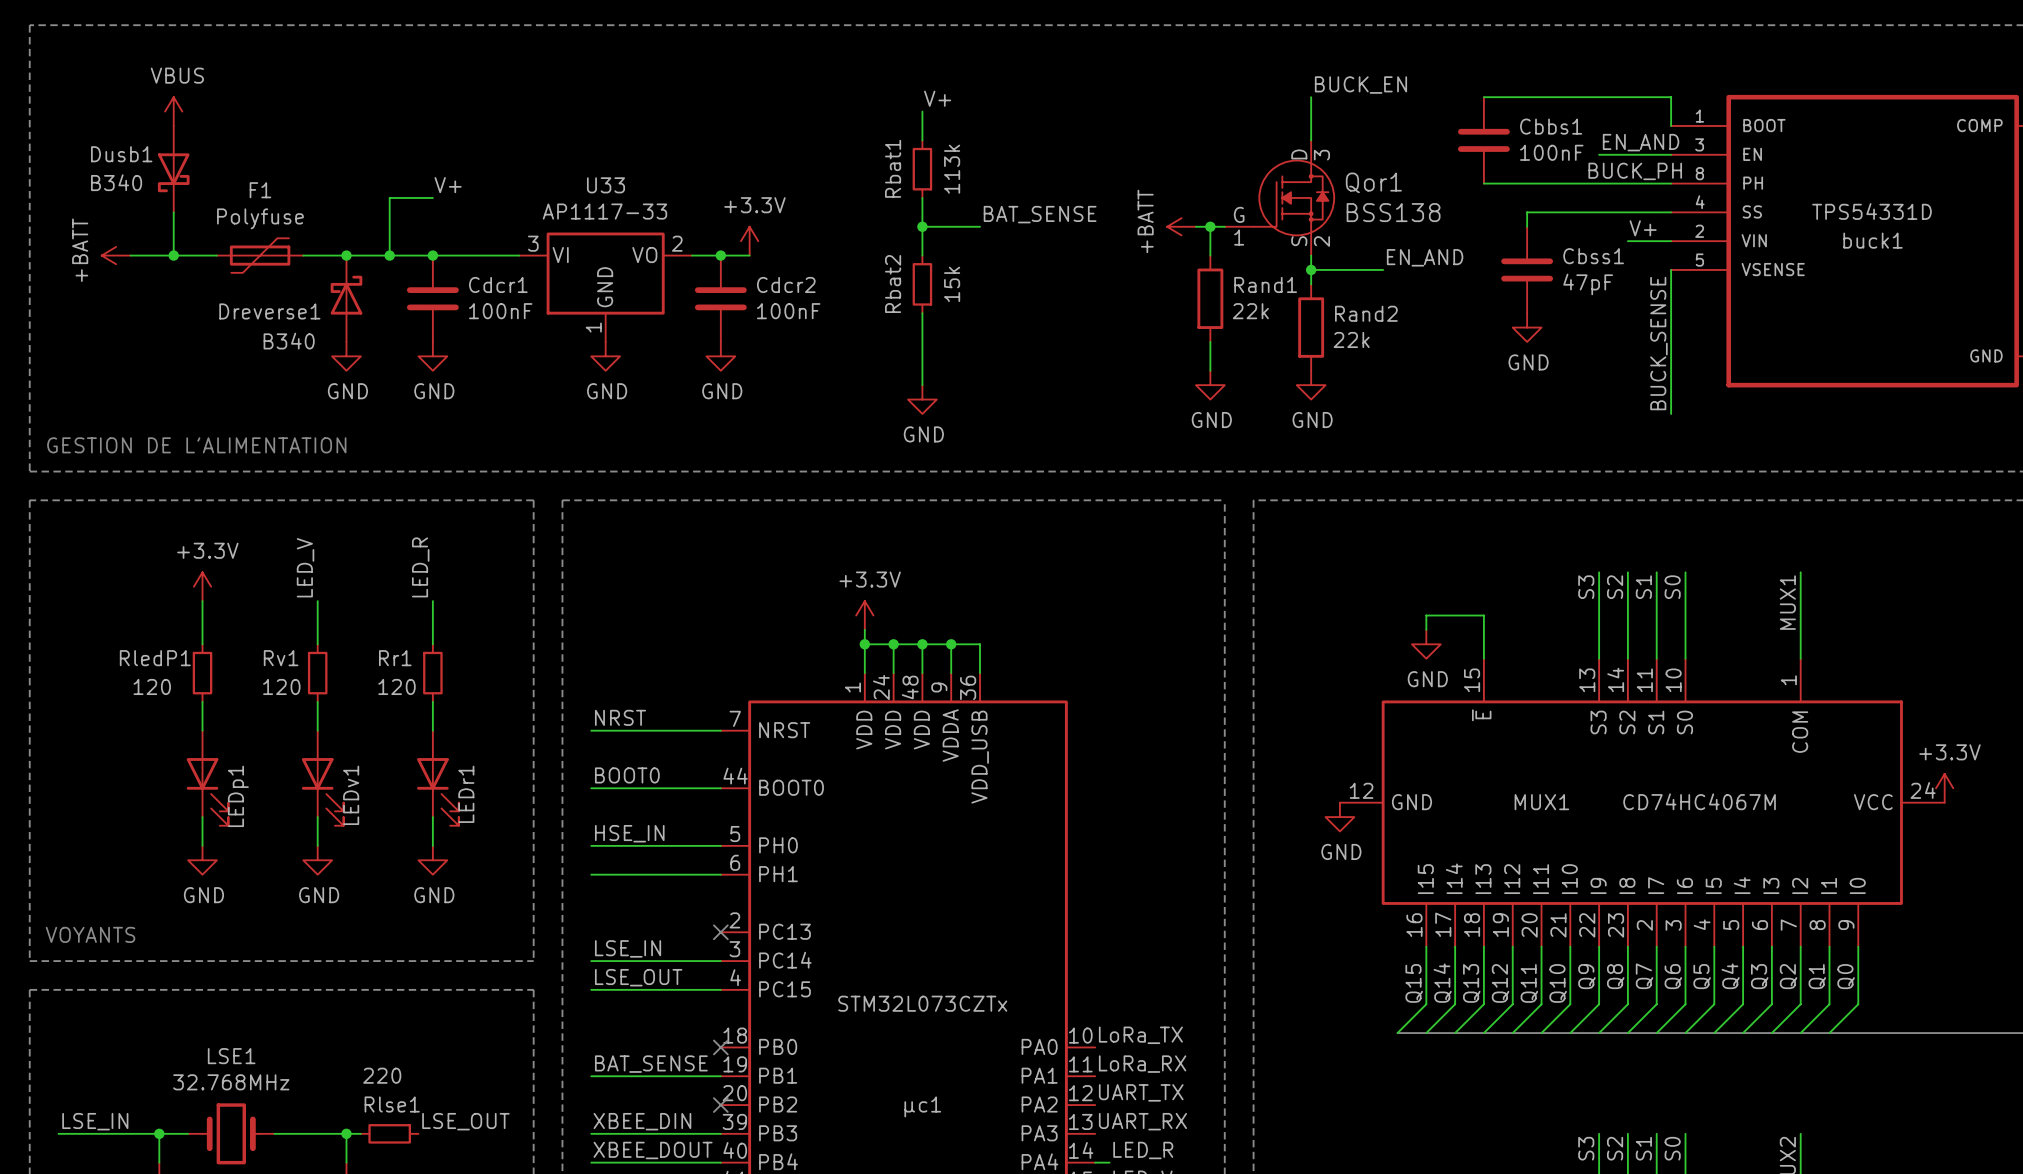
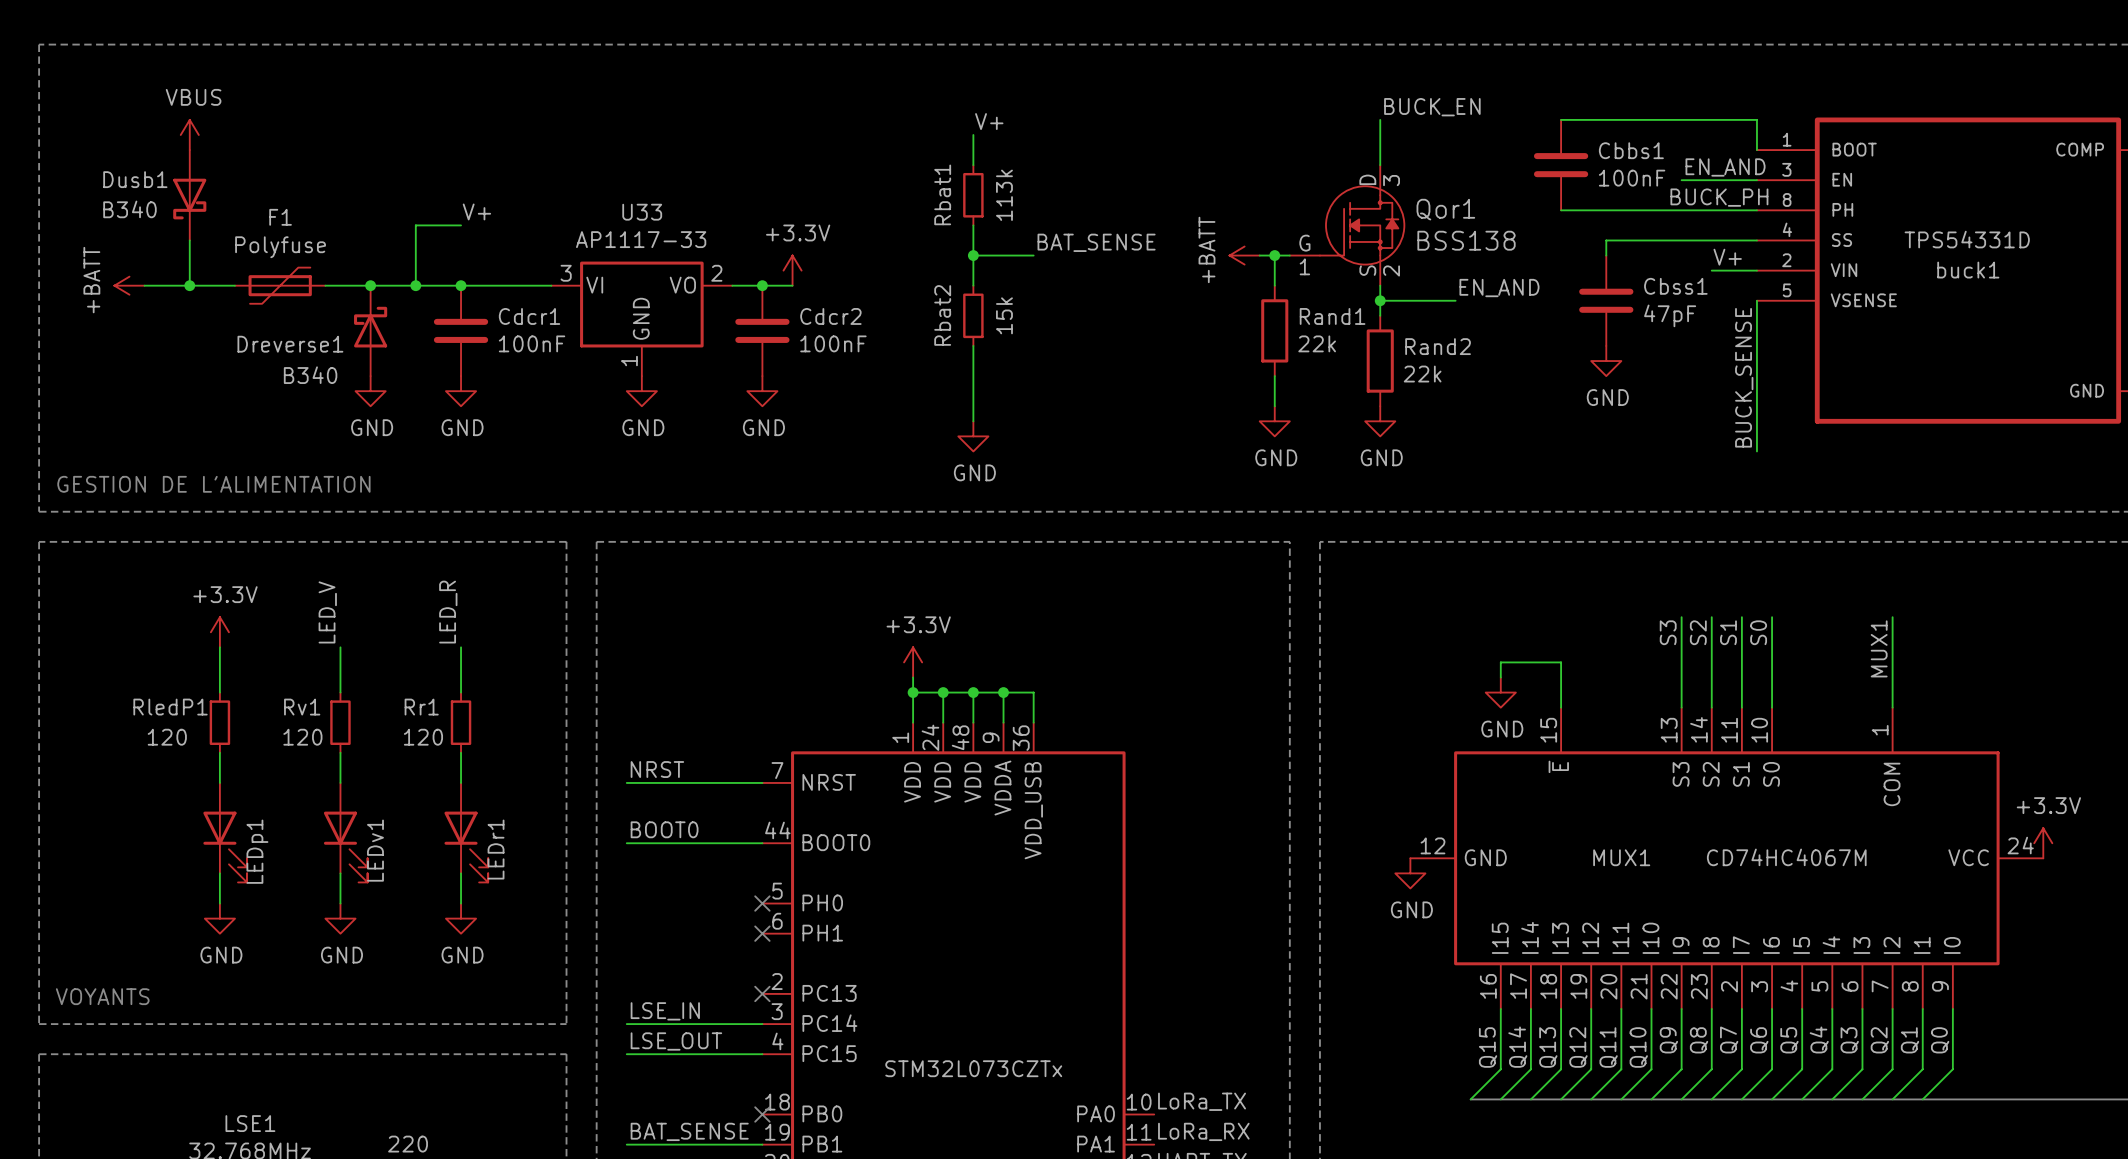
label: HSE_IN (629, 833) -> none
wire: (591, 845) (720, 845) -> none
no-connect mark: none -> (762, 903)
wire: (591, 874) (720, 874) -> none
no-connect mark: none -> (762, 933)

